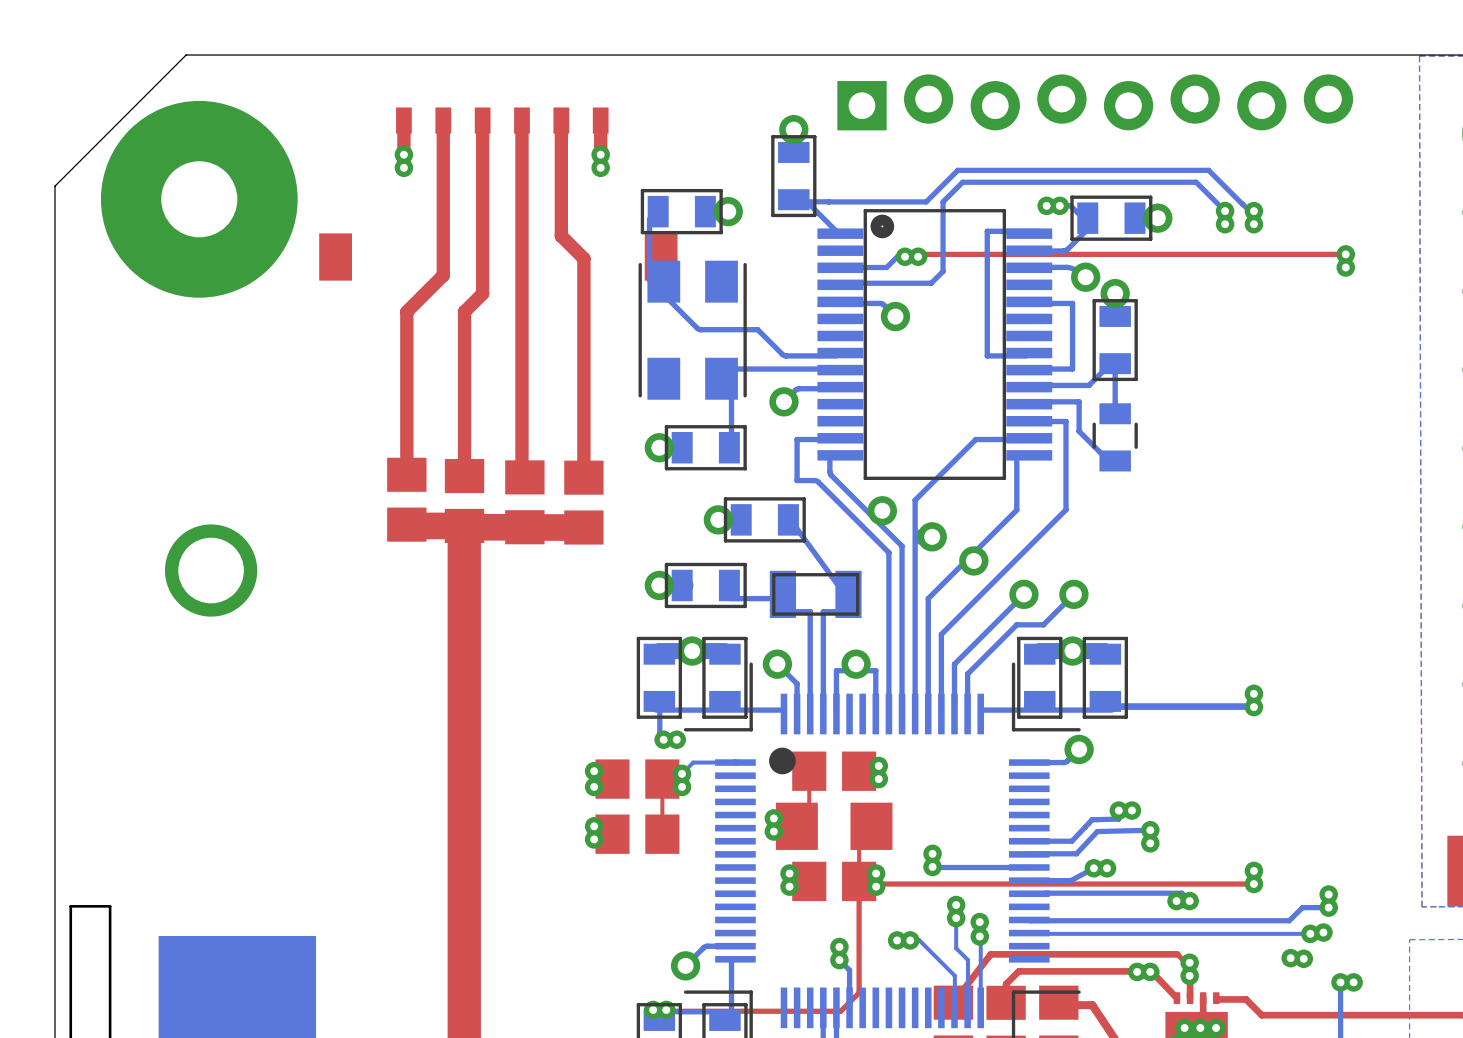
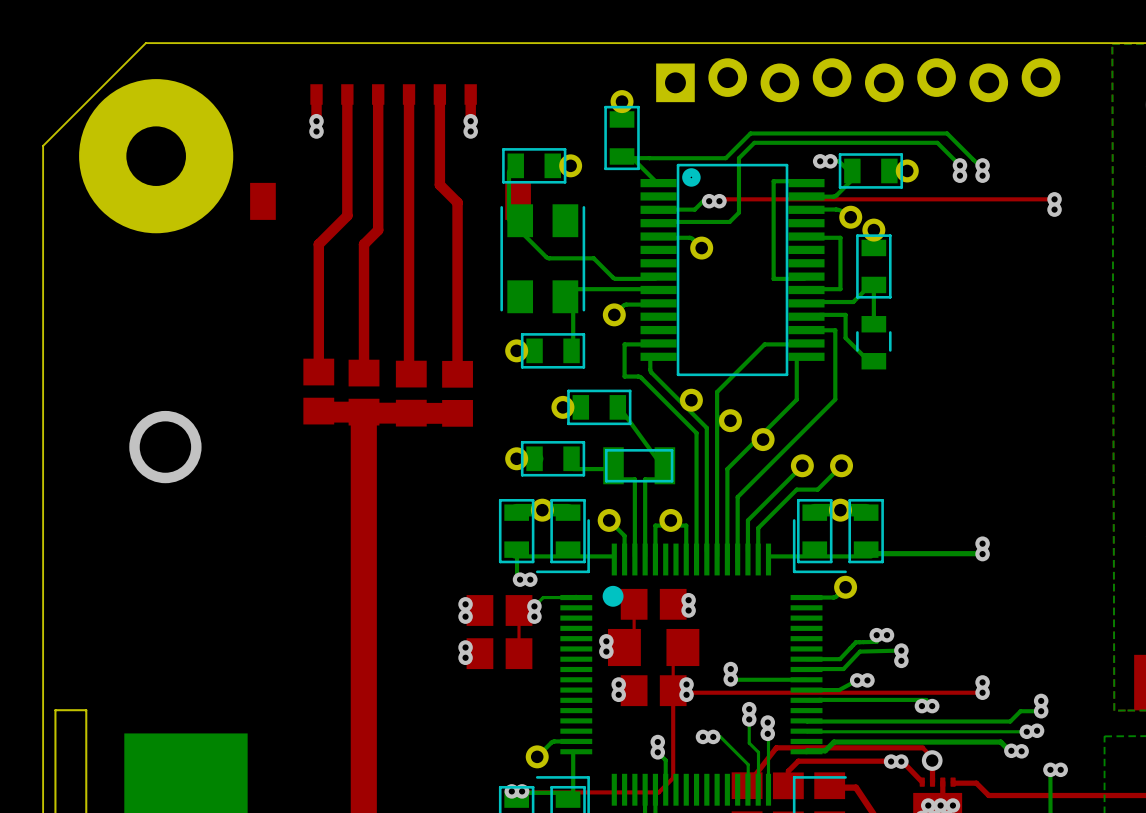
bottom track: none -> (1010, 751) (1000, 742) (834, 742) (825, 750) (806, 751)
via: (1189, 962) -> none
via: none -> (932, 760)
via: (1189, 975) -> none

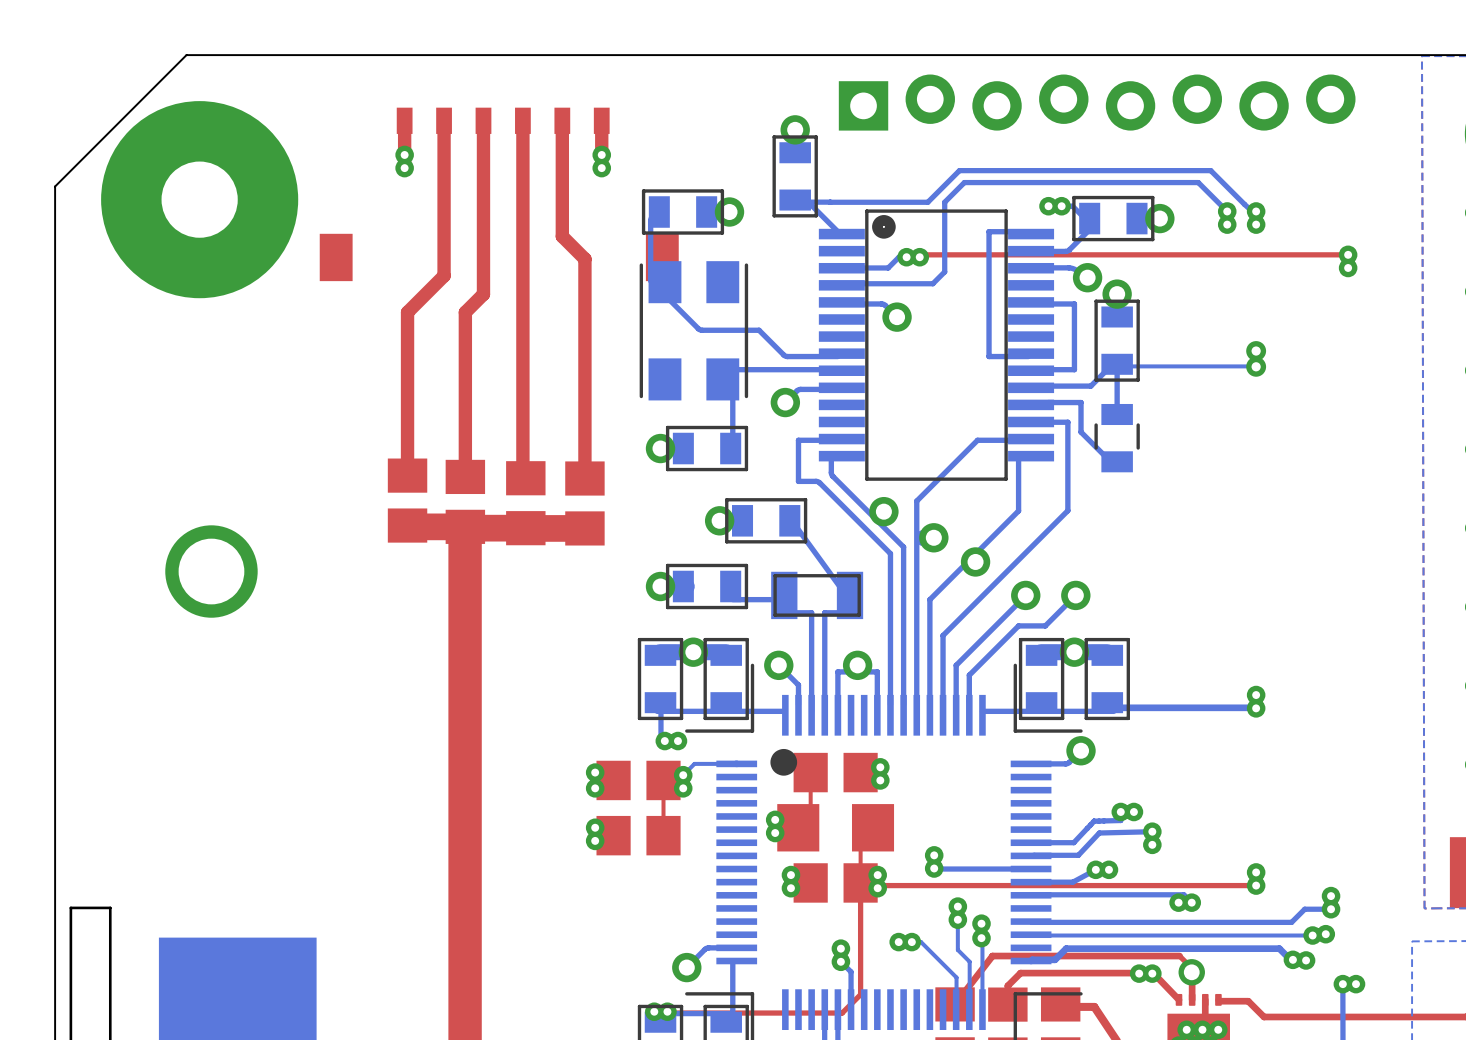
via: none -> (1256, 351)
bottom track: none -> (1256, 366) (1117, 366)
via: none -> (1256, 366)

